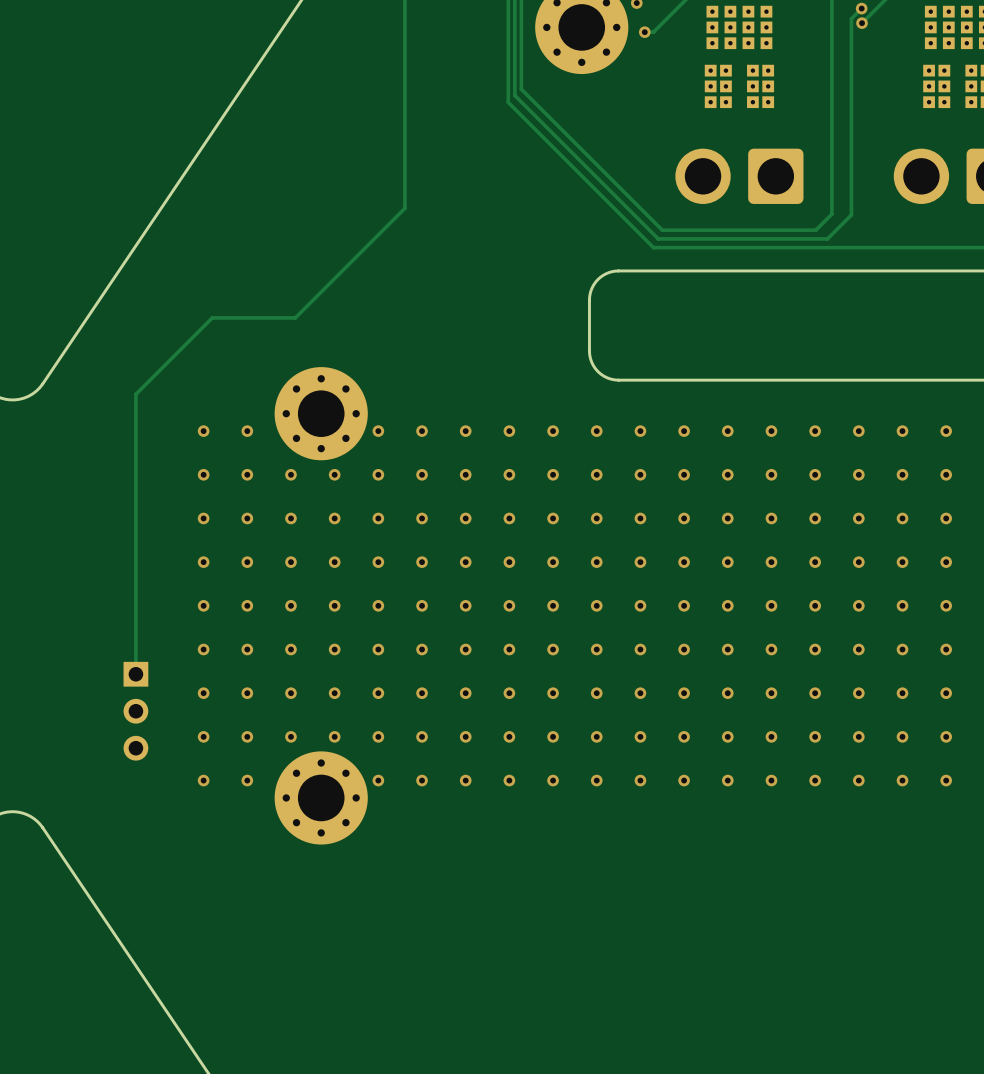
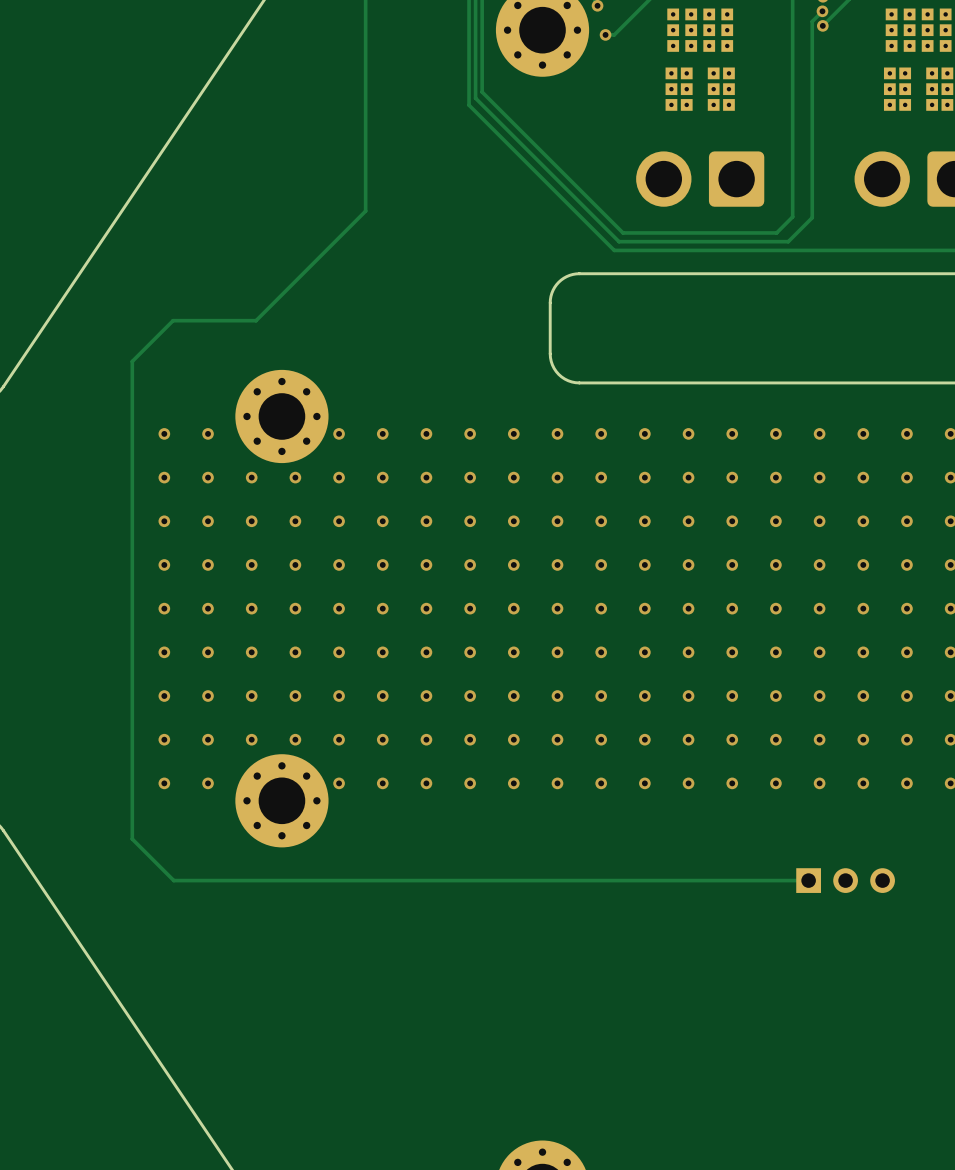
track: (171, 358) (135, 394) (135, 674) -> (132, 361) (132, 839) (173, 880) (808, 880)
part: (135, 711) -> none
part: none -> (845, 880)

